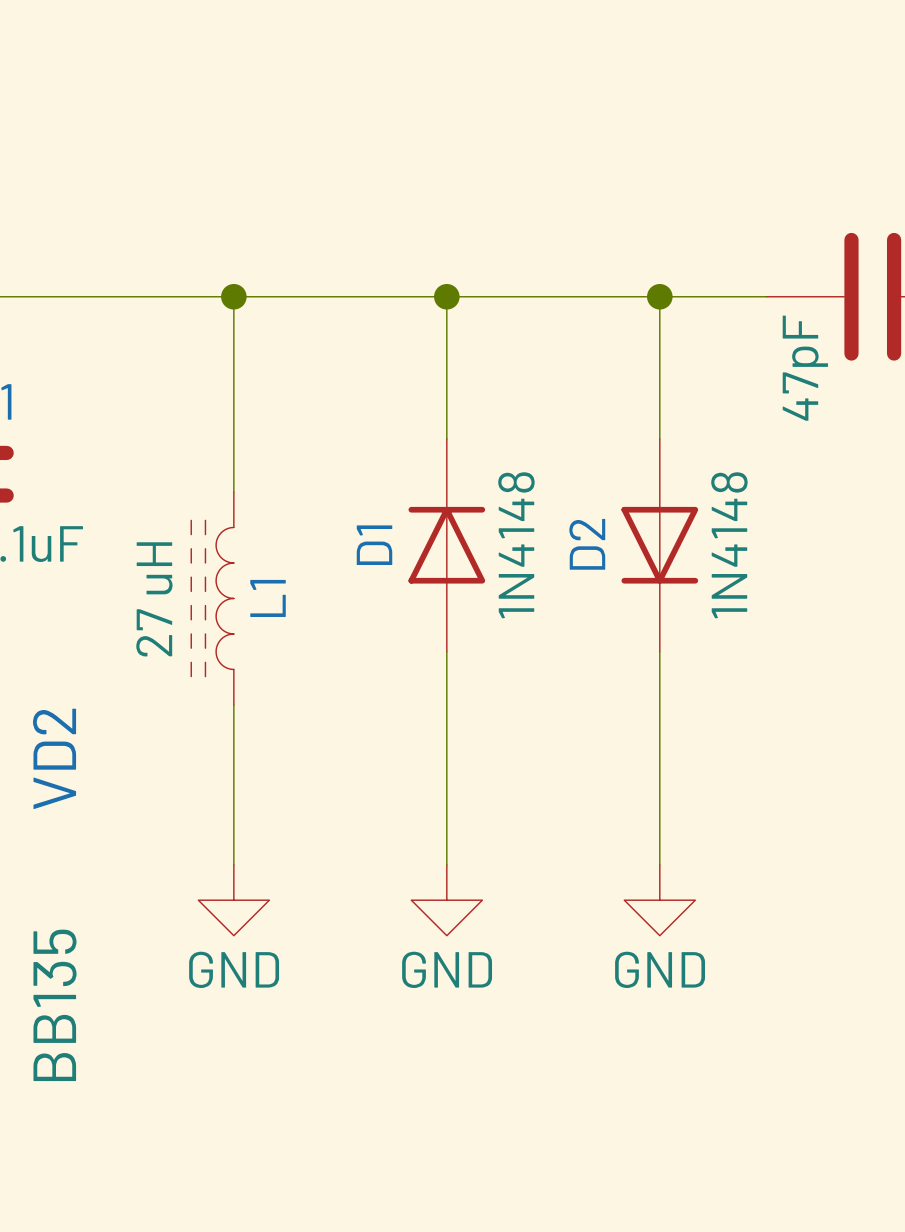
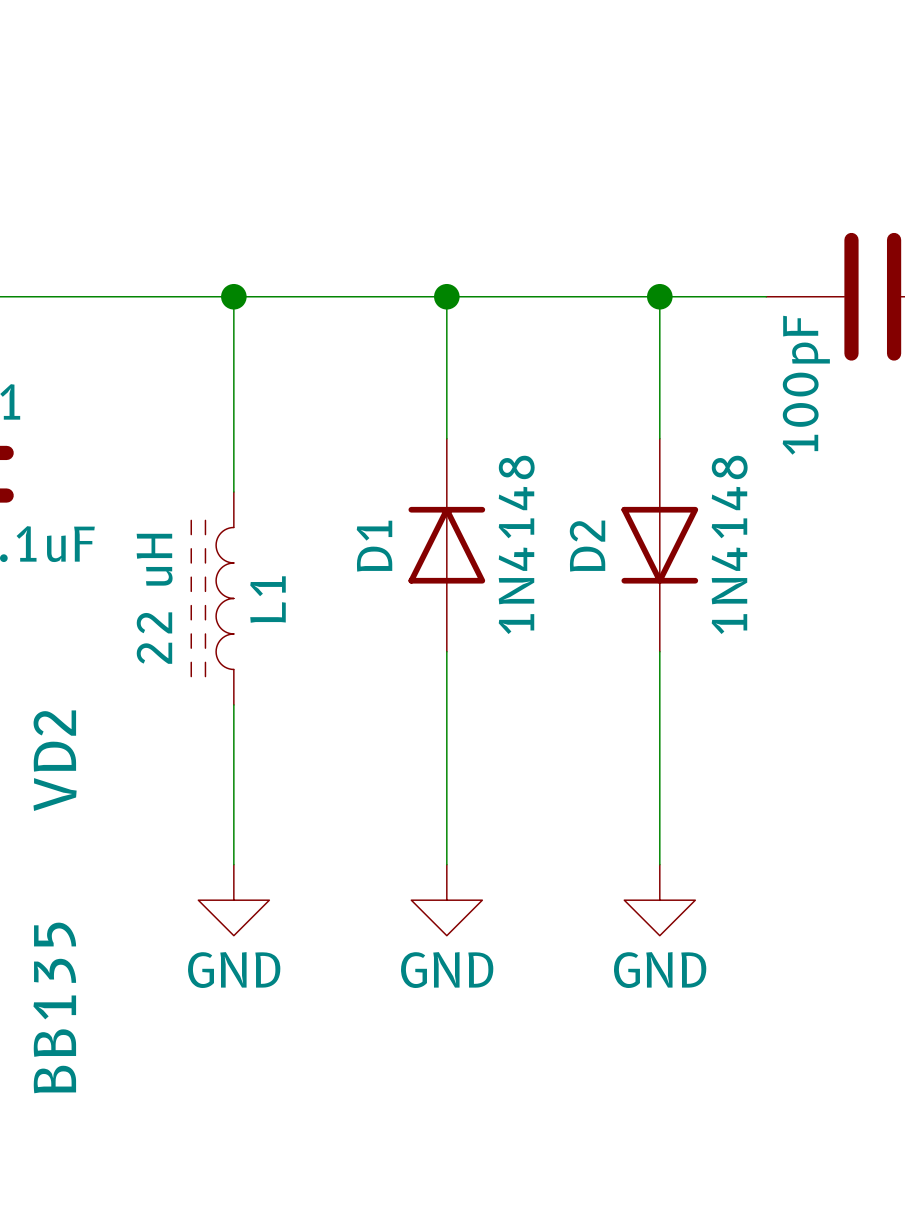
part value: 47pF (805, 368) -> 100pF (806, 385)
L1 value: 27 uH (154, 599) -> 22 uH (154, 598)

